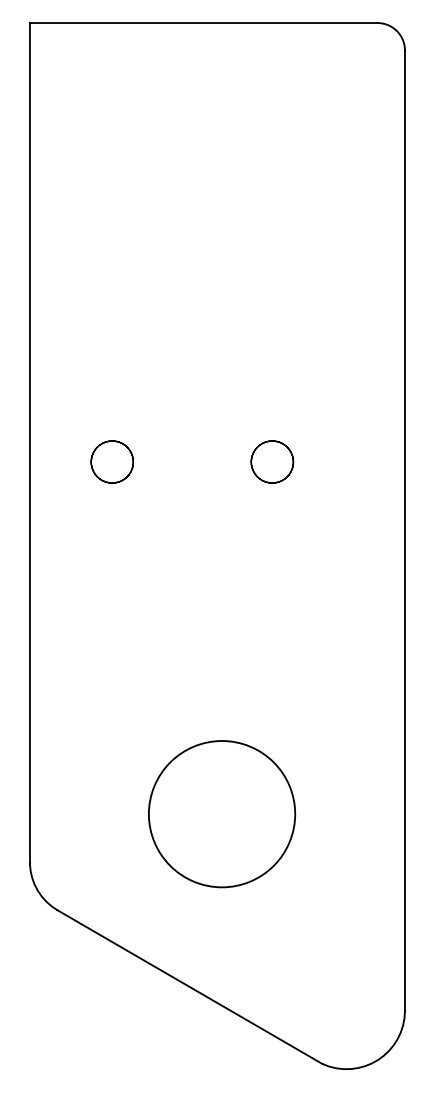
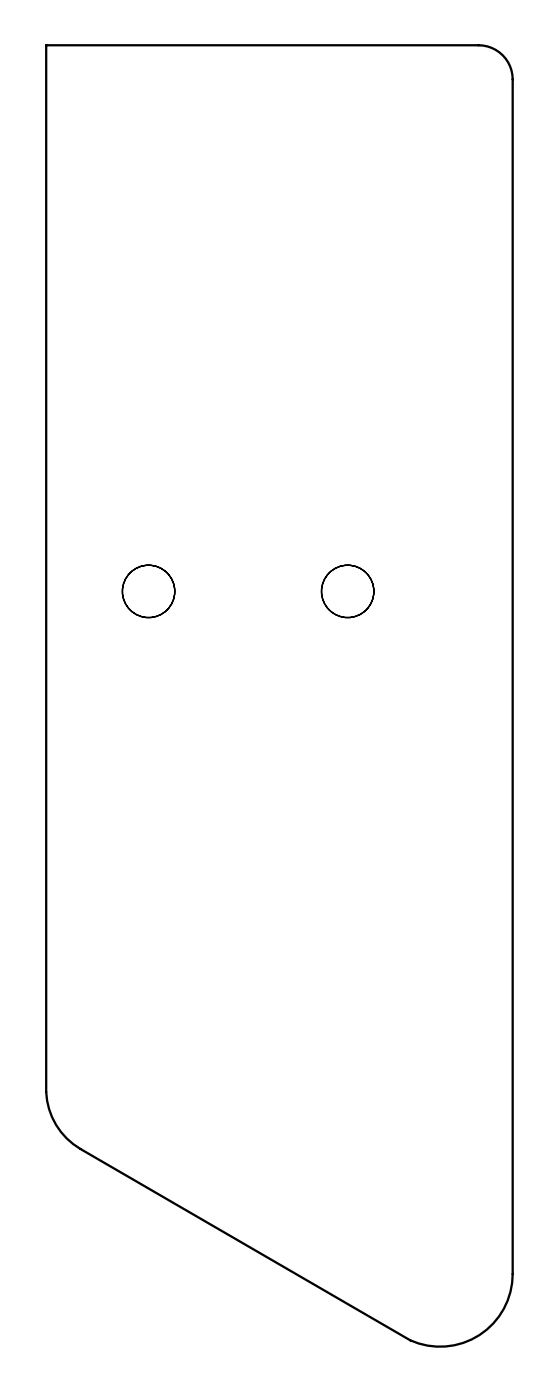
round board edge: [147, 740, 297, 889] -> none

